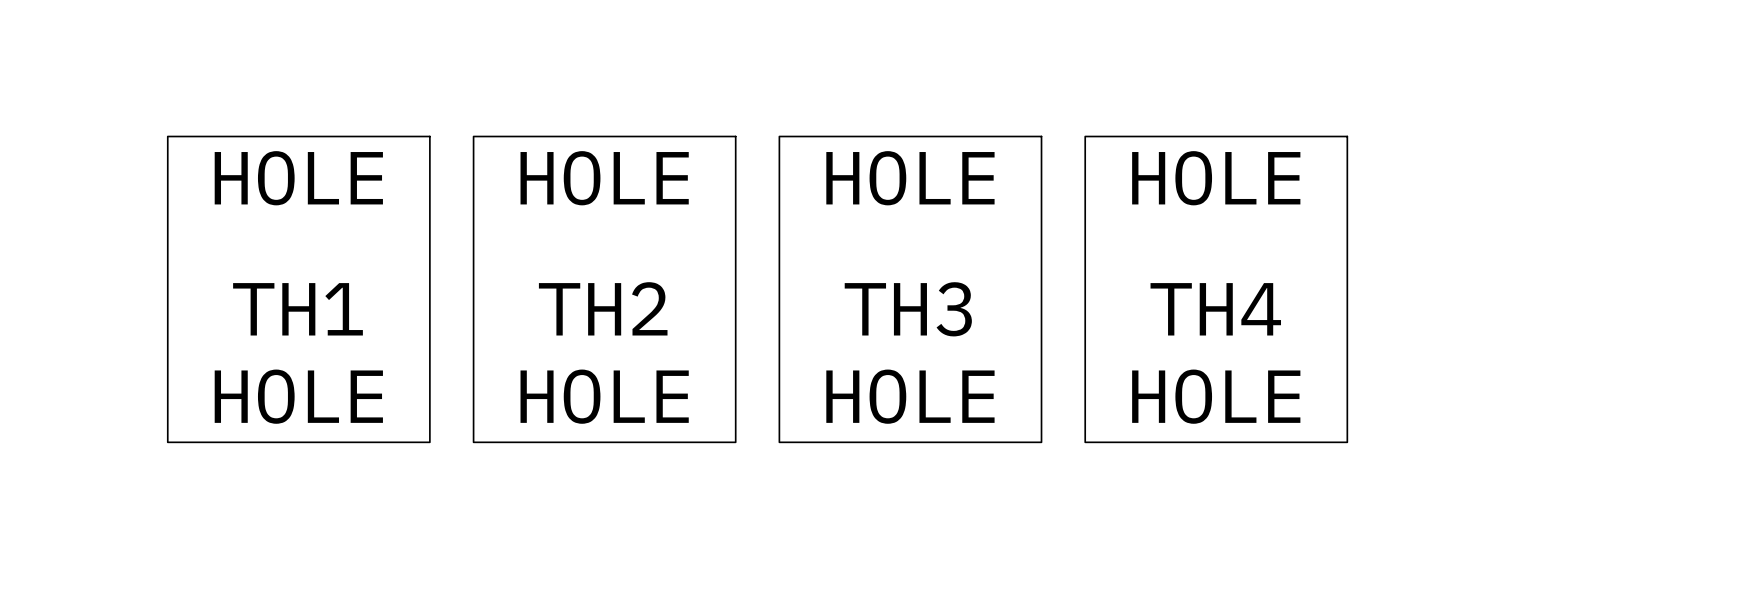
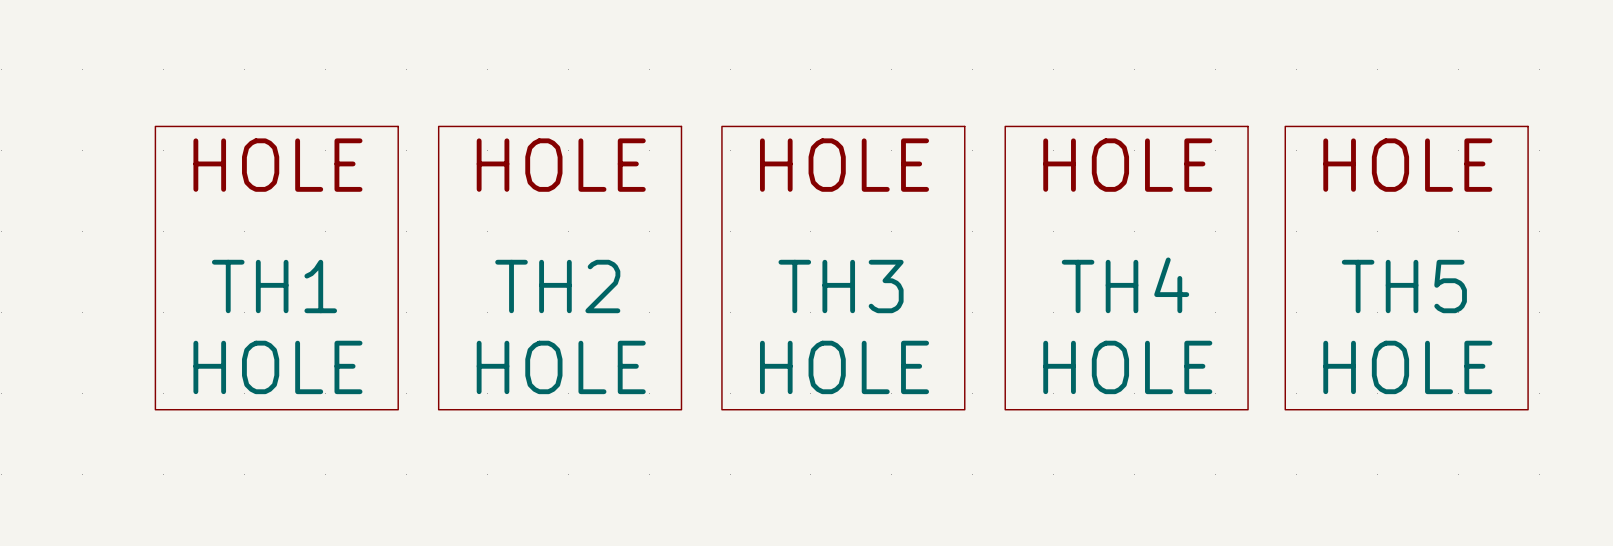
TH5: none -> HOLE (1406, 268)

